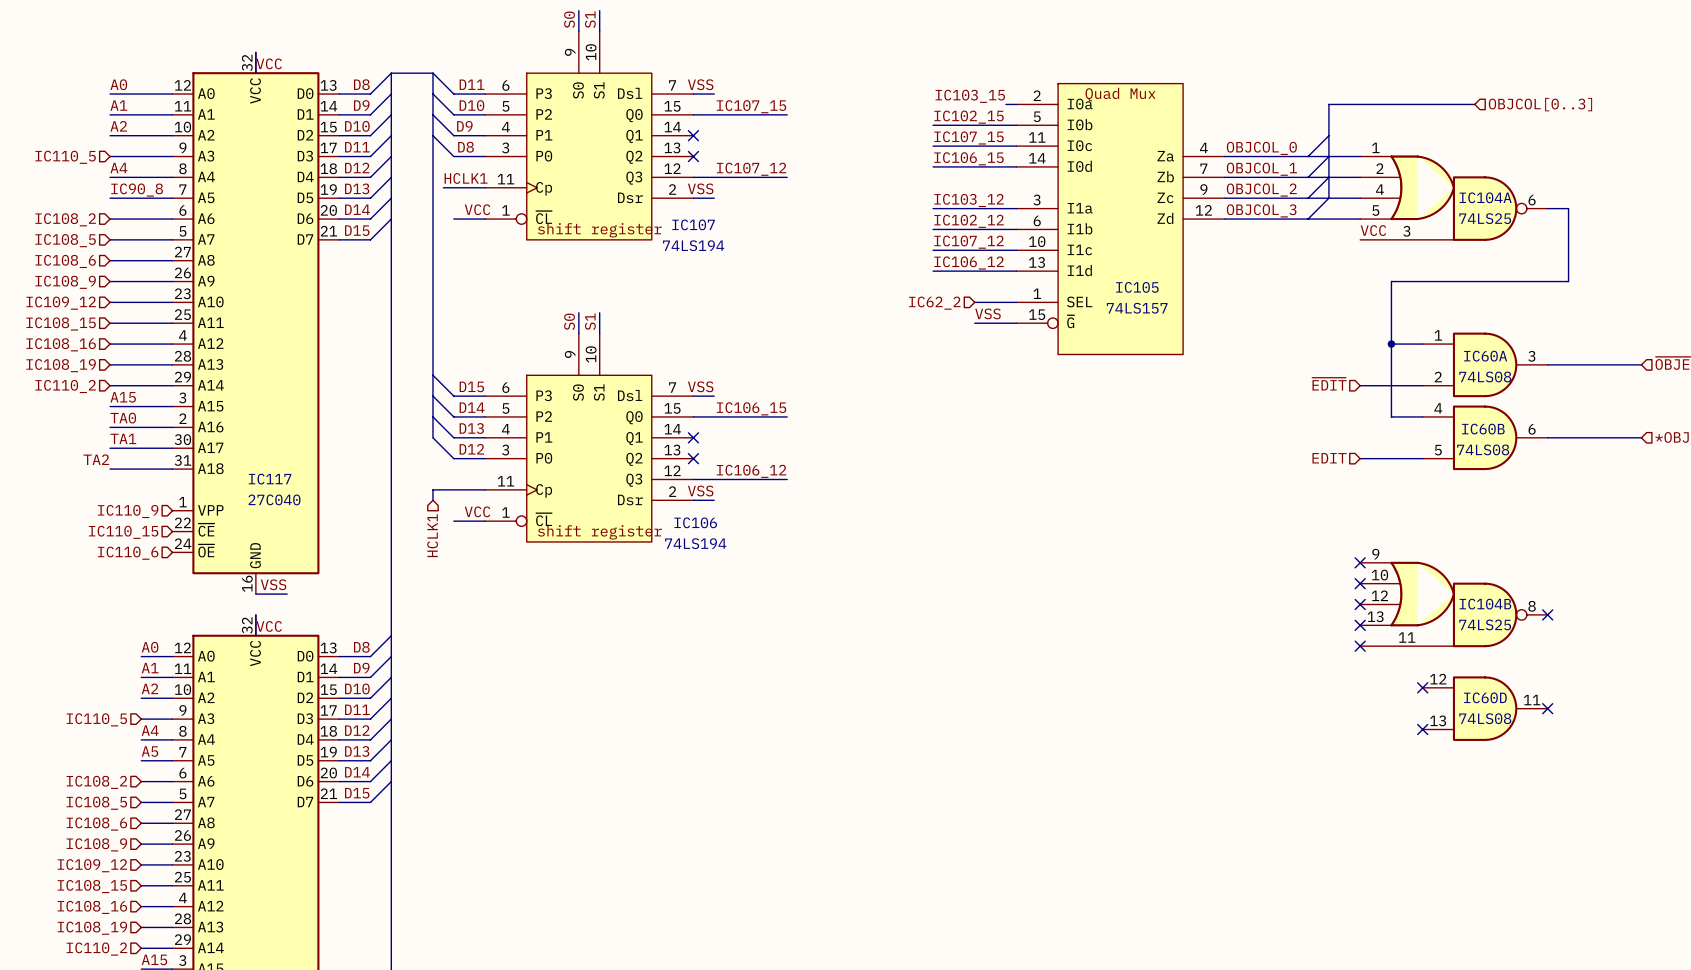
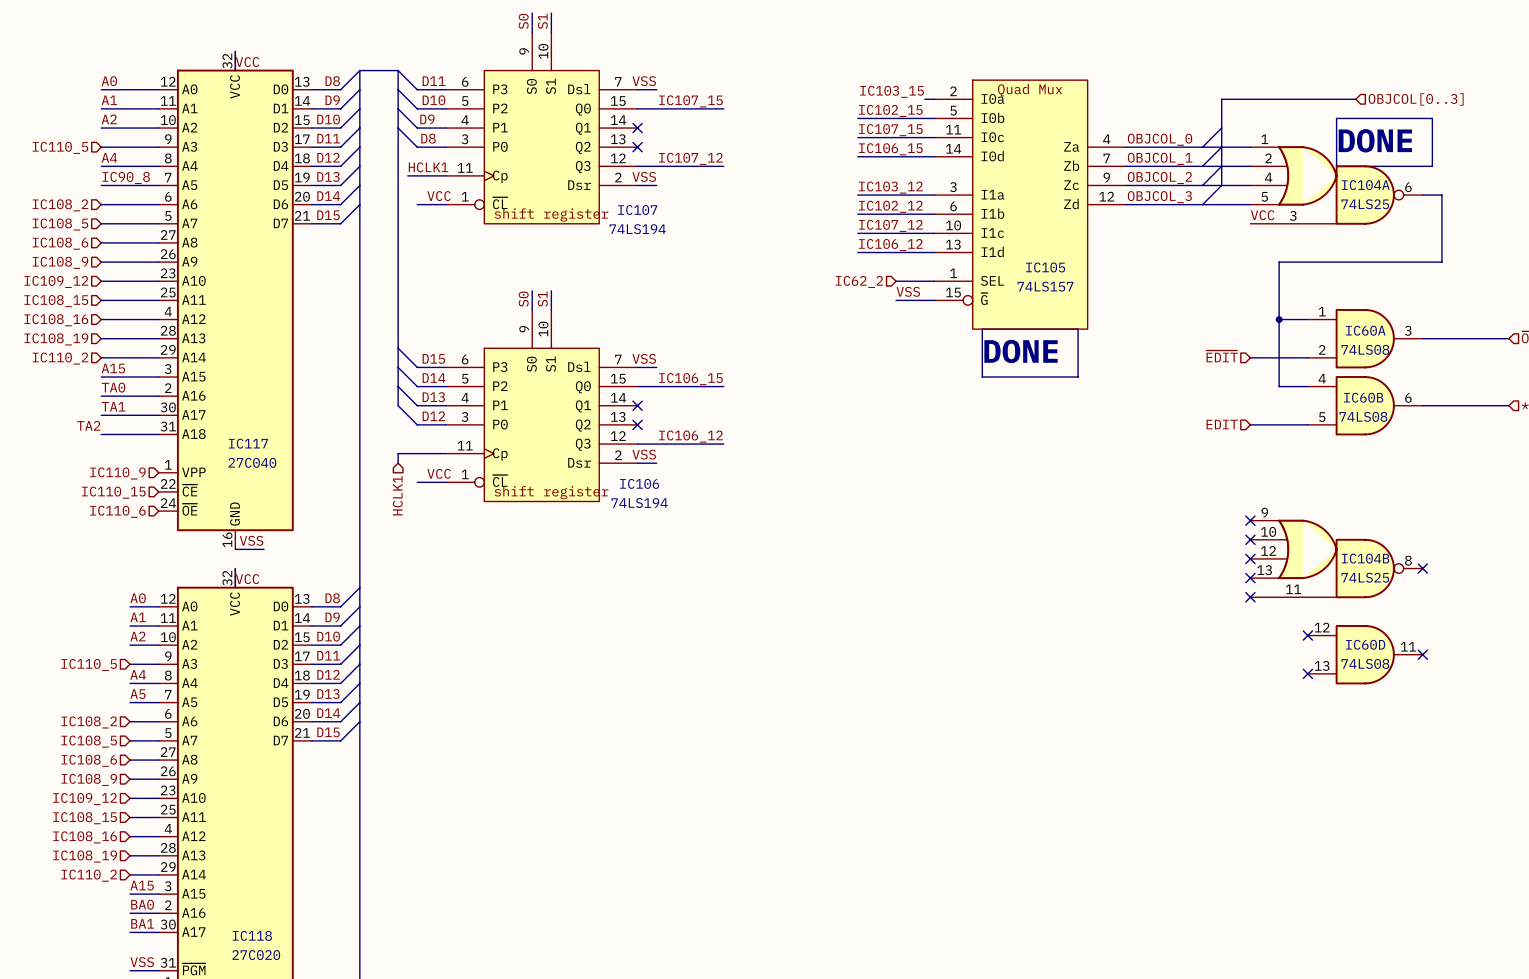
line: none -> (1336, 118) (1432, 118) (1432, 166) (1336, 166) (1336, 118)
text: none -> DONE (1375, 140)
line: none -> (982, 329) (1078, 329) (1078, 377) (982, 377) (982, 329)
text: none -> DONE (1021, 351)

